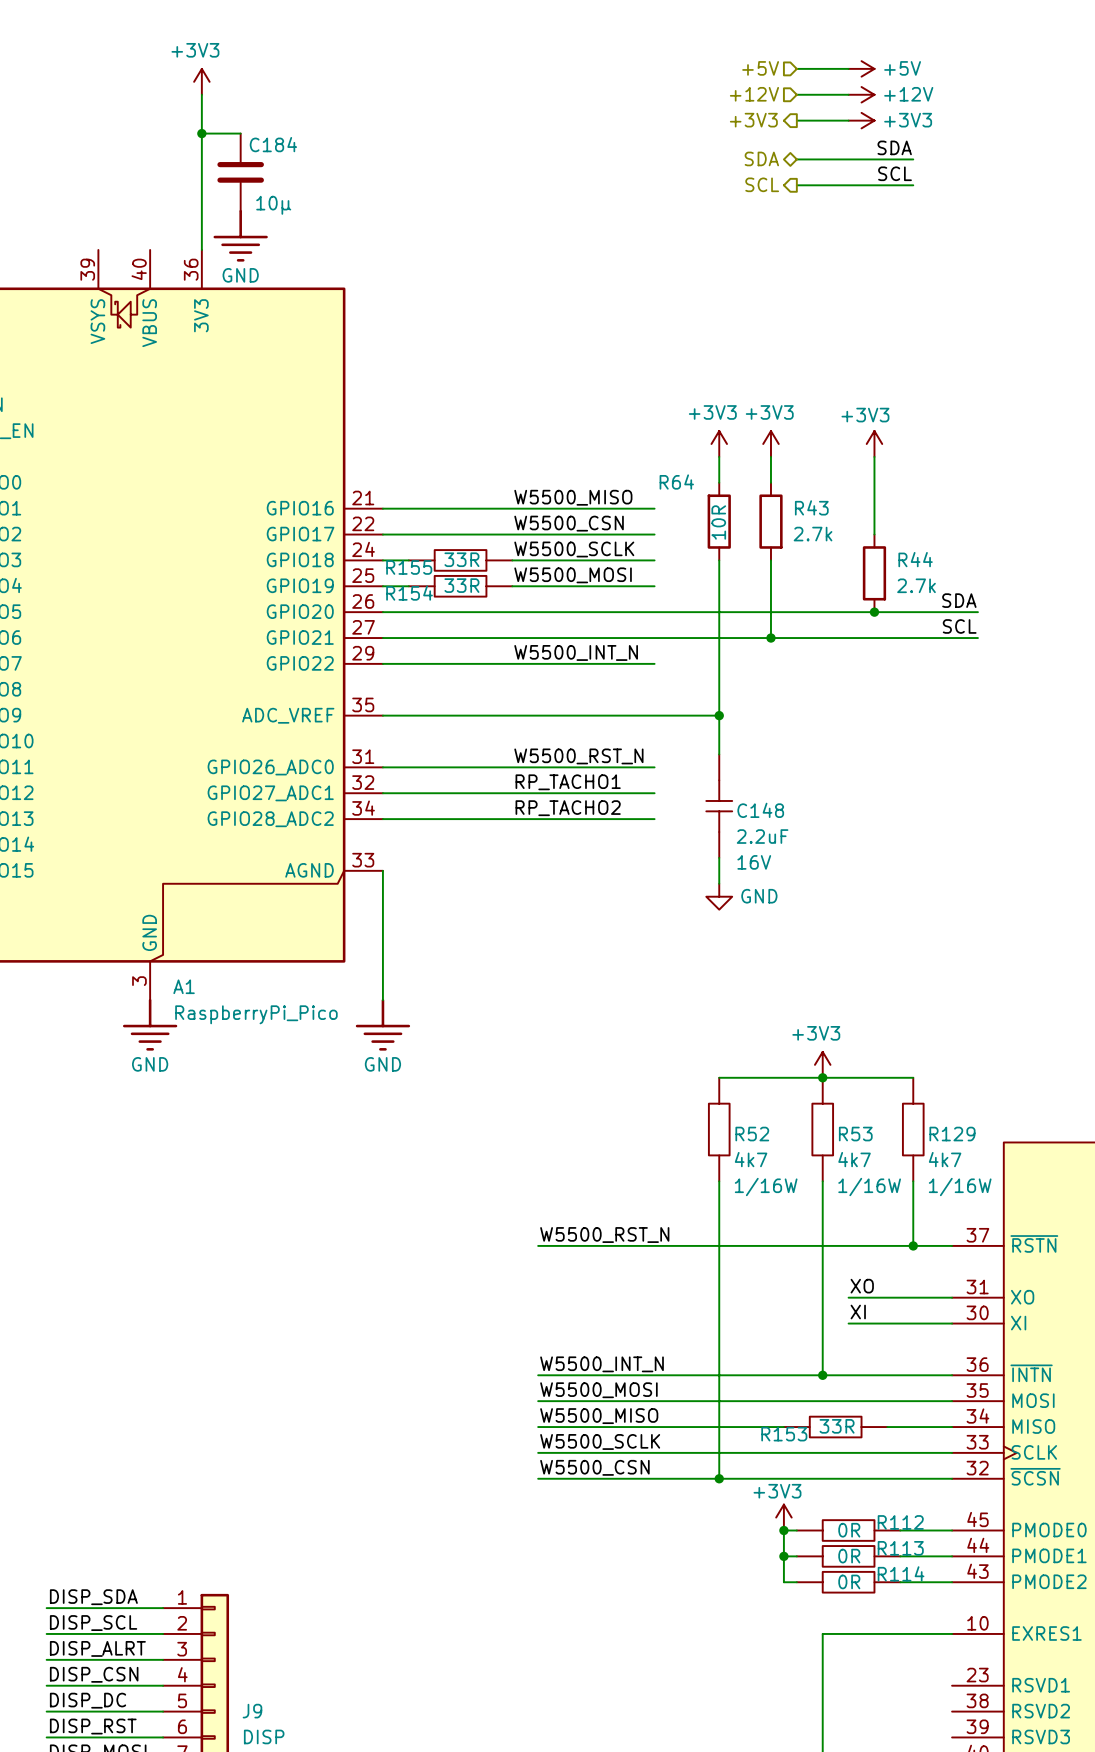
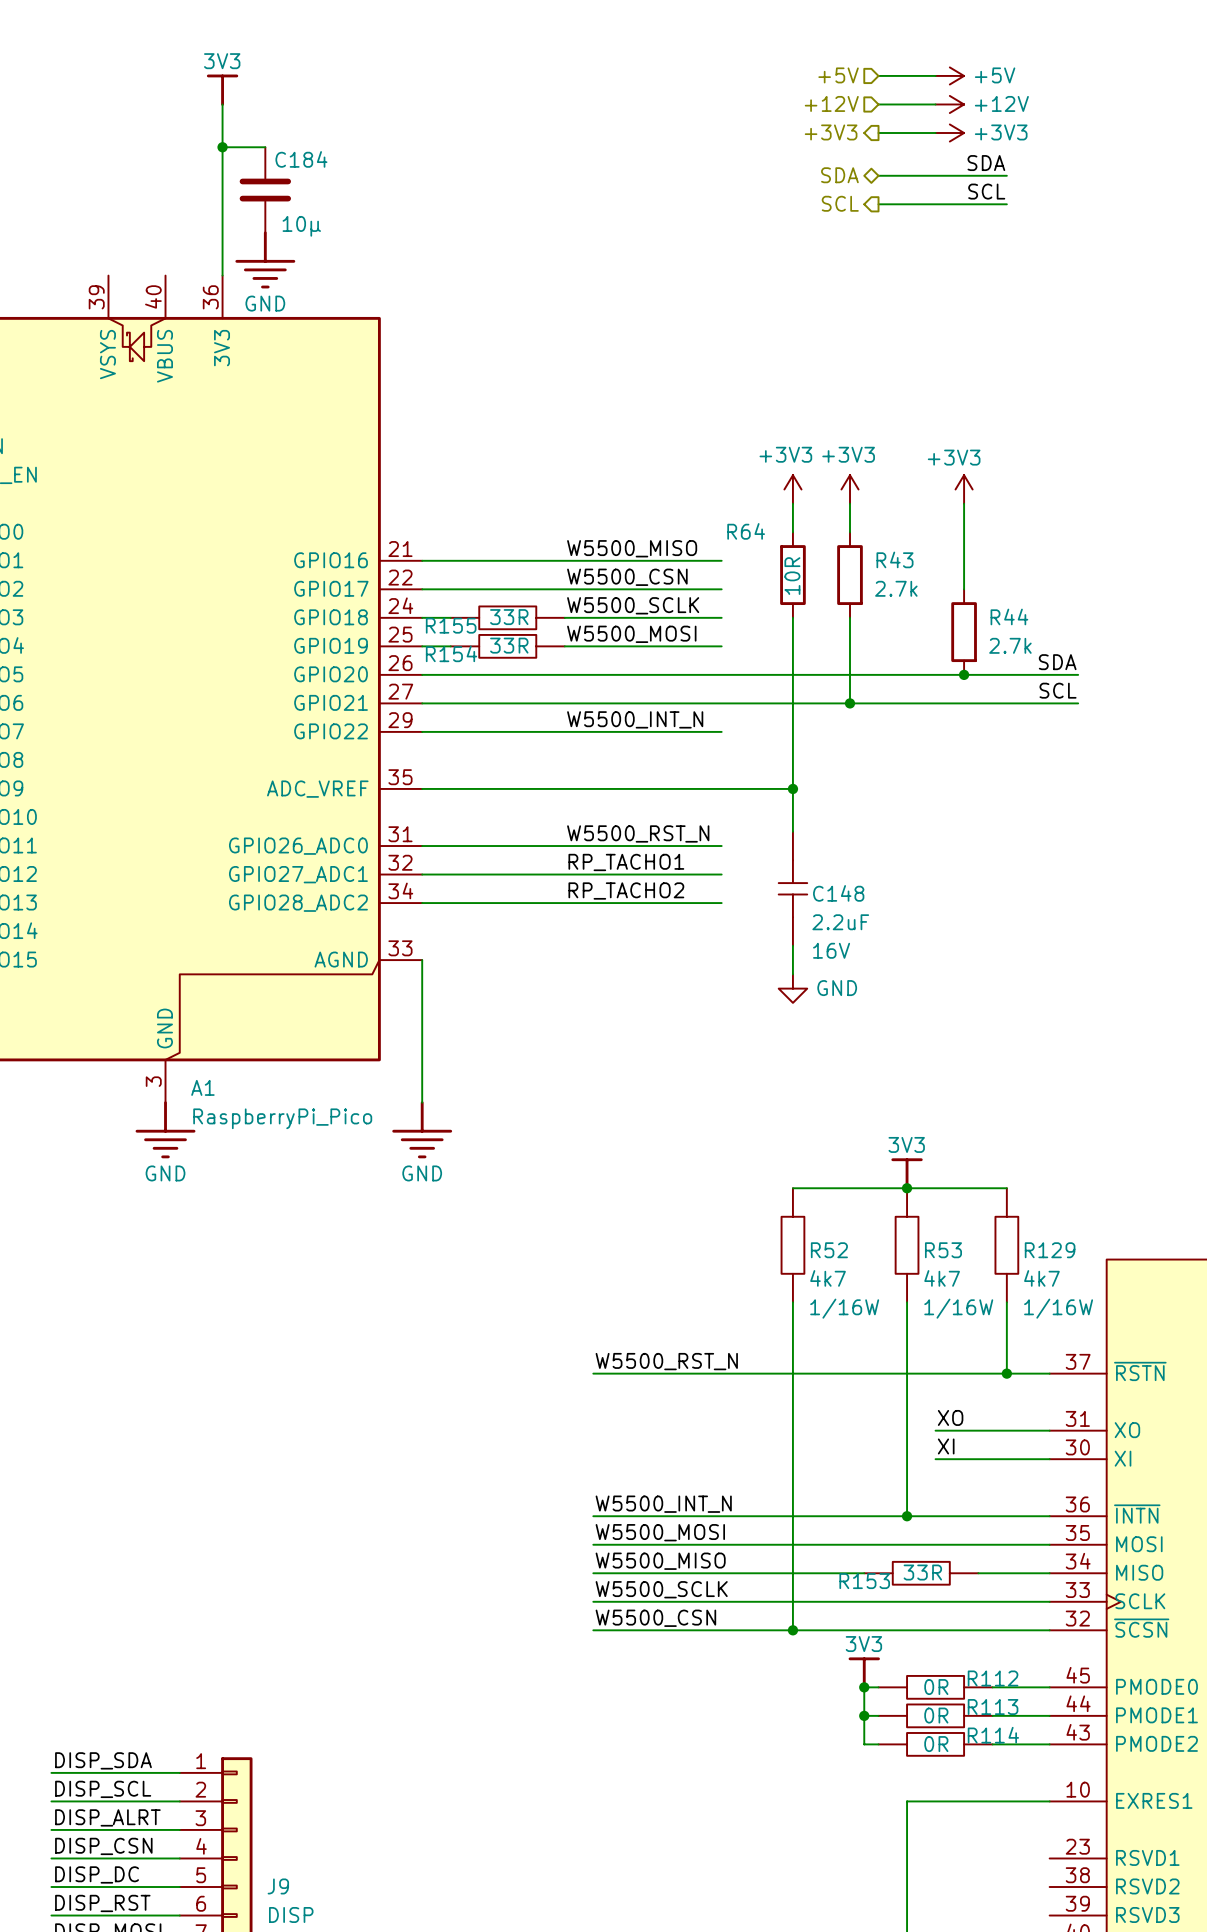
power symbol: +3V3 (201, 81) -> 3V3 (222, 90)
power symbol: +3V3 (822, 1064) -> 3V3 (907, 1173)
power symbol: +3V3 (783, 1517) -> 3V3 (864, 1673)

